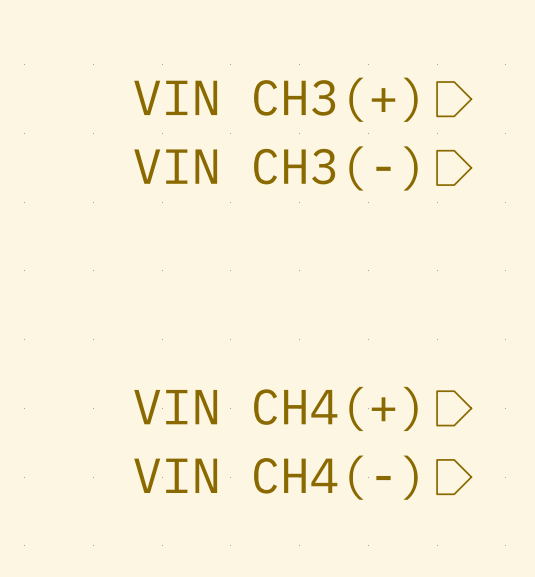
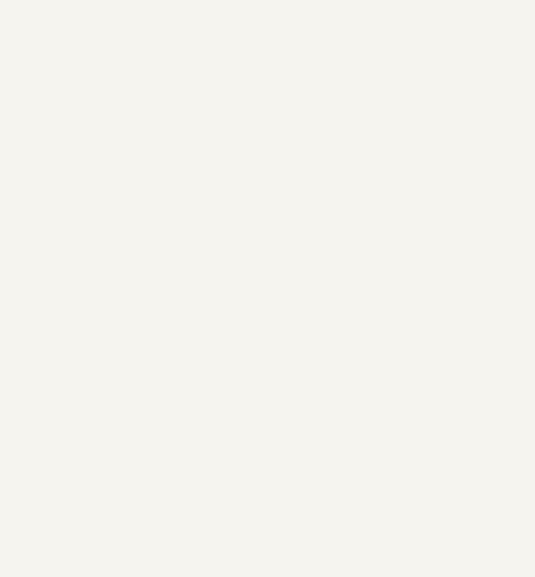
hierarchical label: VIN CH3(+) (275, 99) -> none
hierarchical label: VIN CH3(-) (275, 168) -> none
hierarchical label: VIN CH4(+) (275, 408) -> none
hierarchical label: VIN CH4(-) (275, 477) -> none

